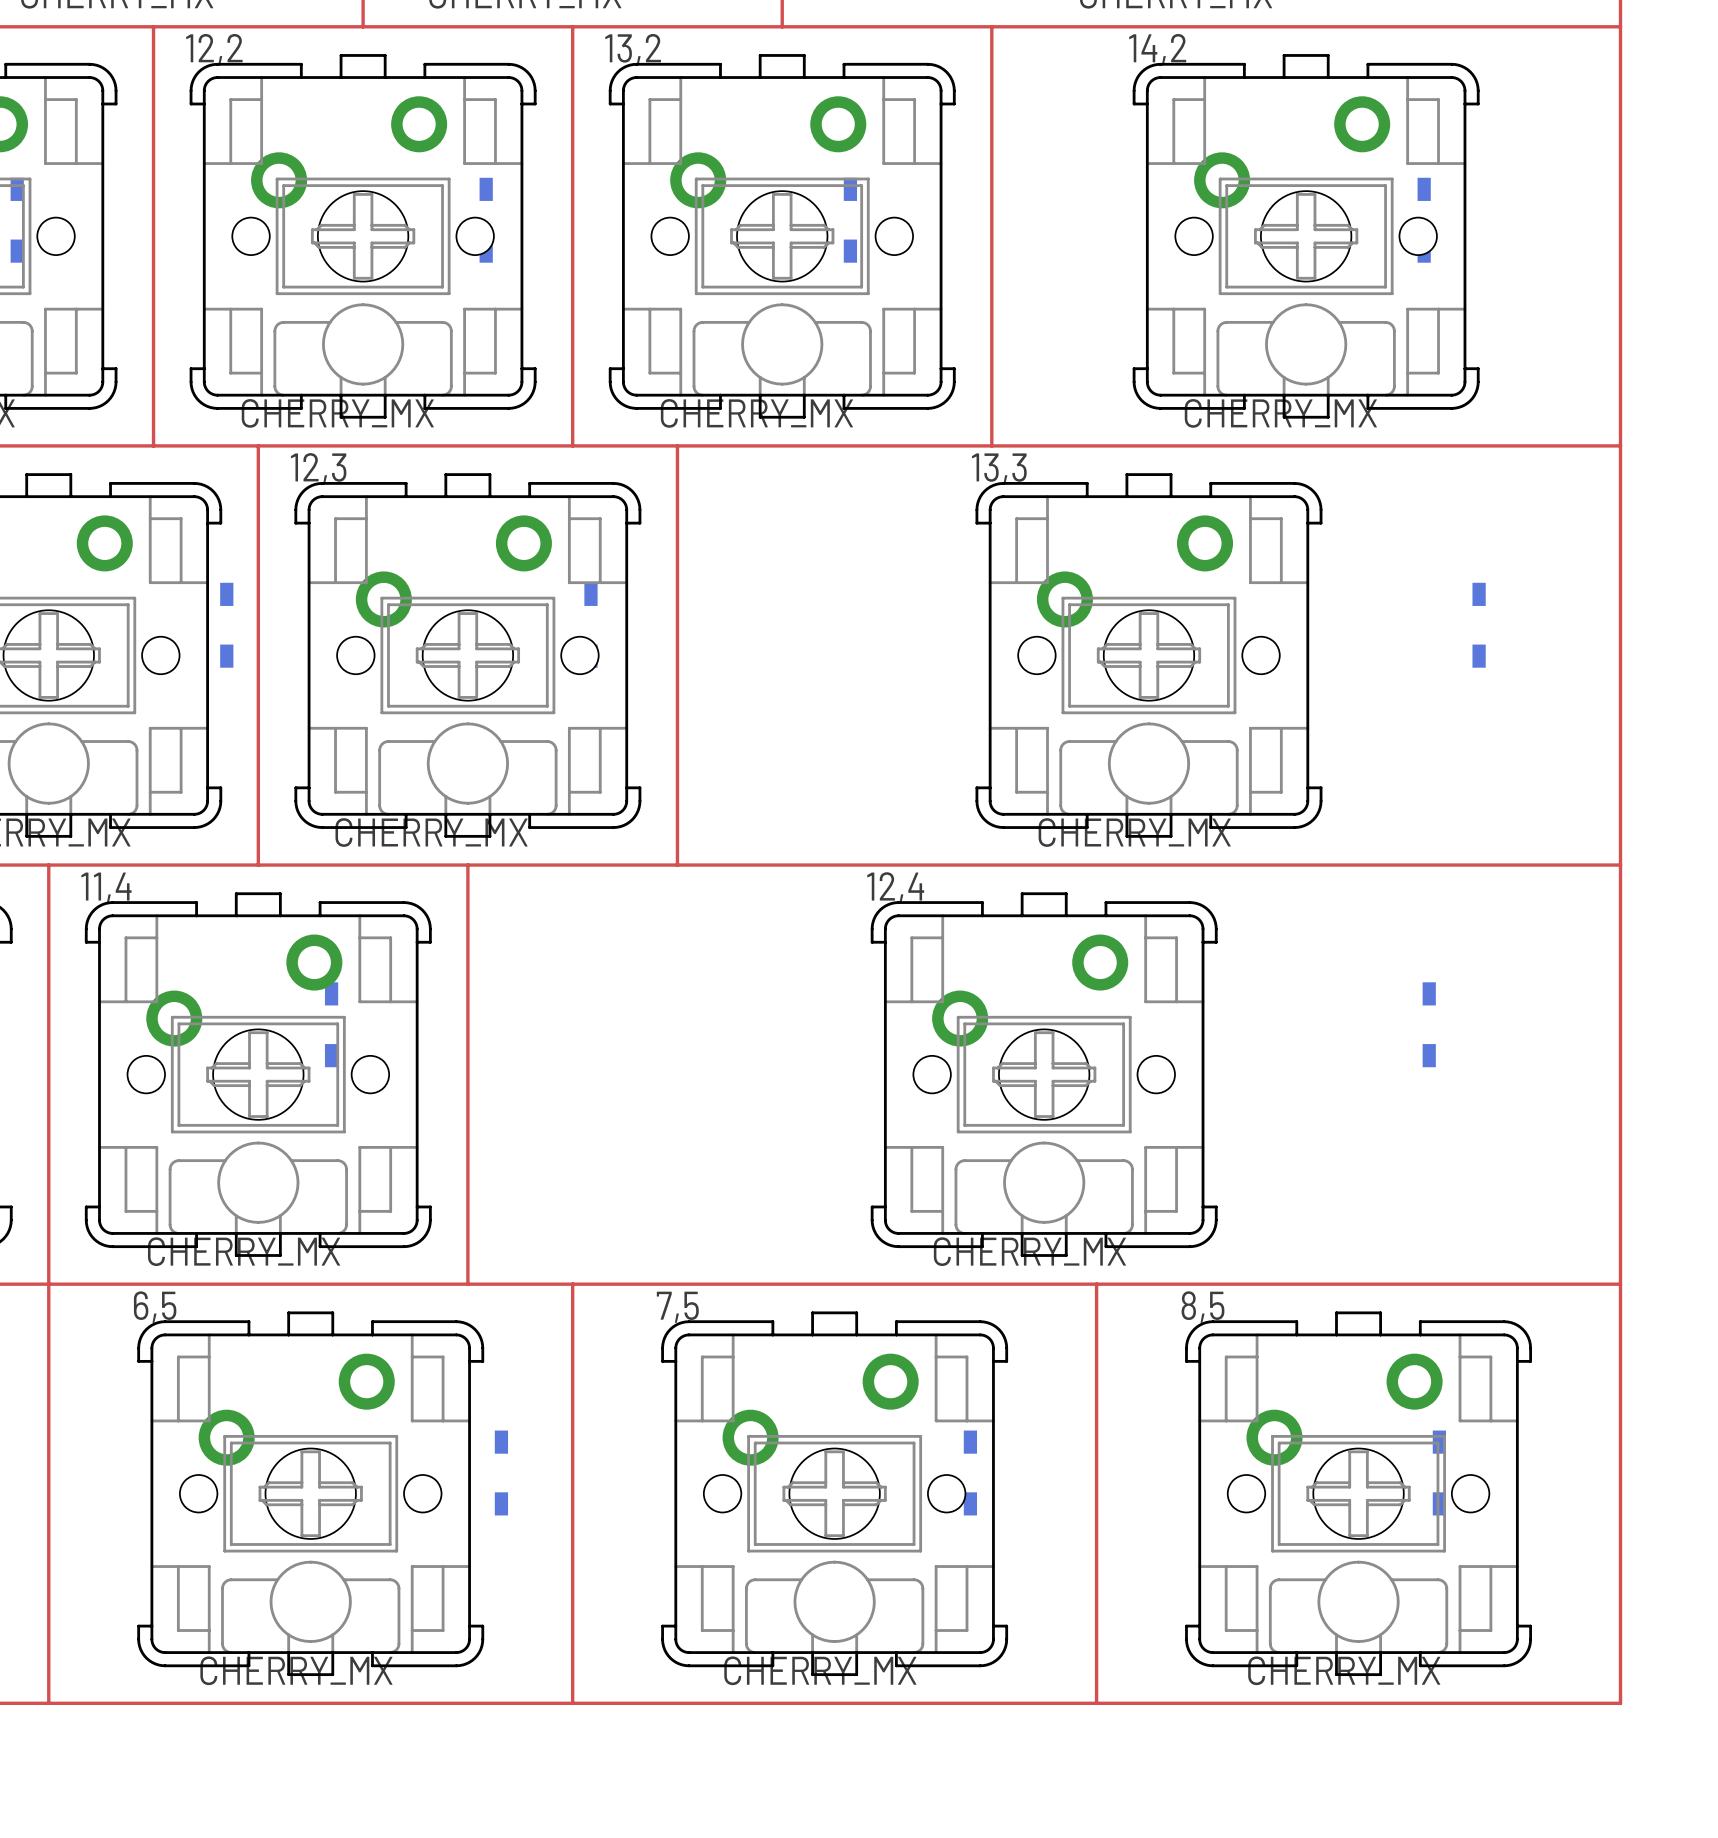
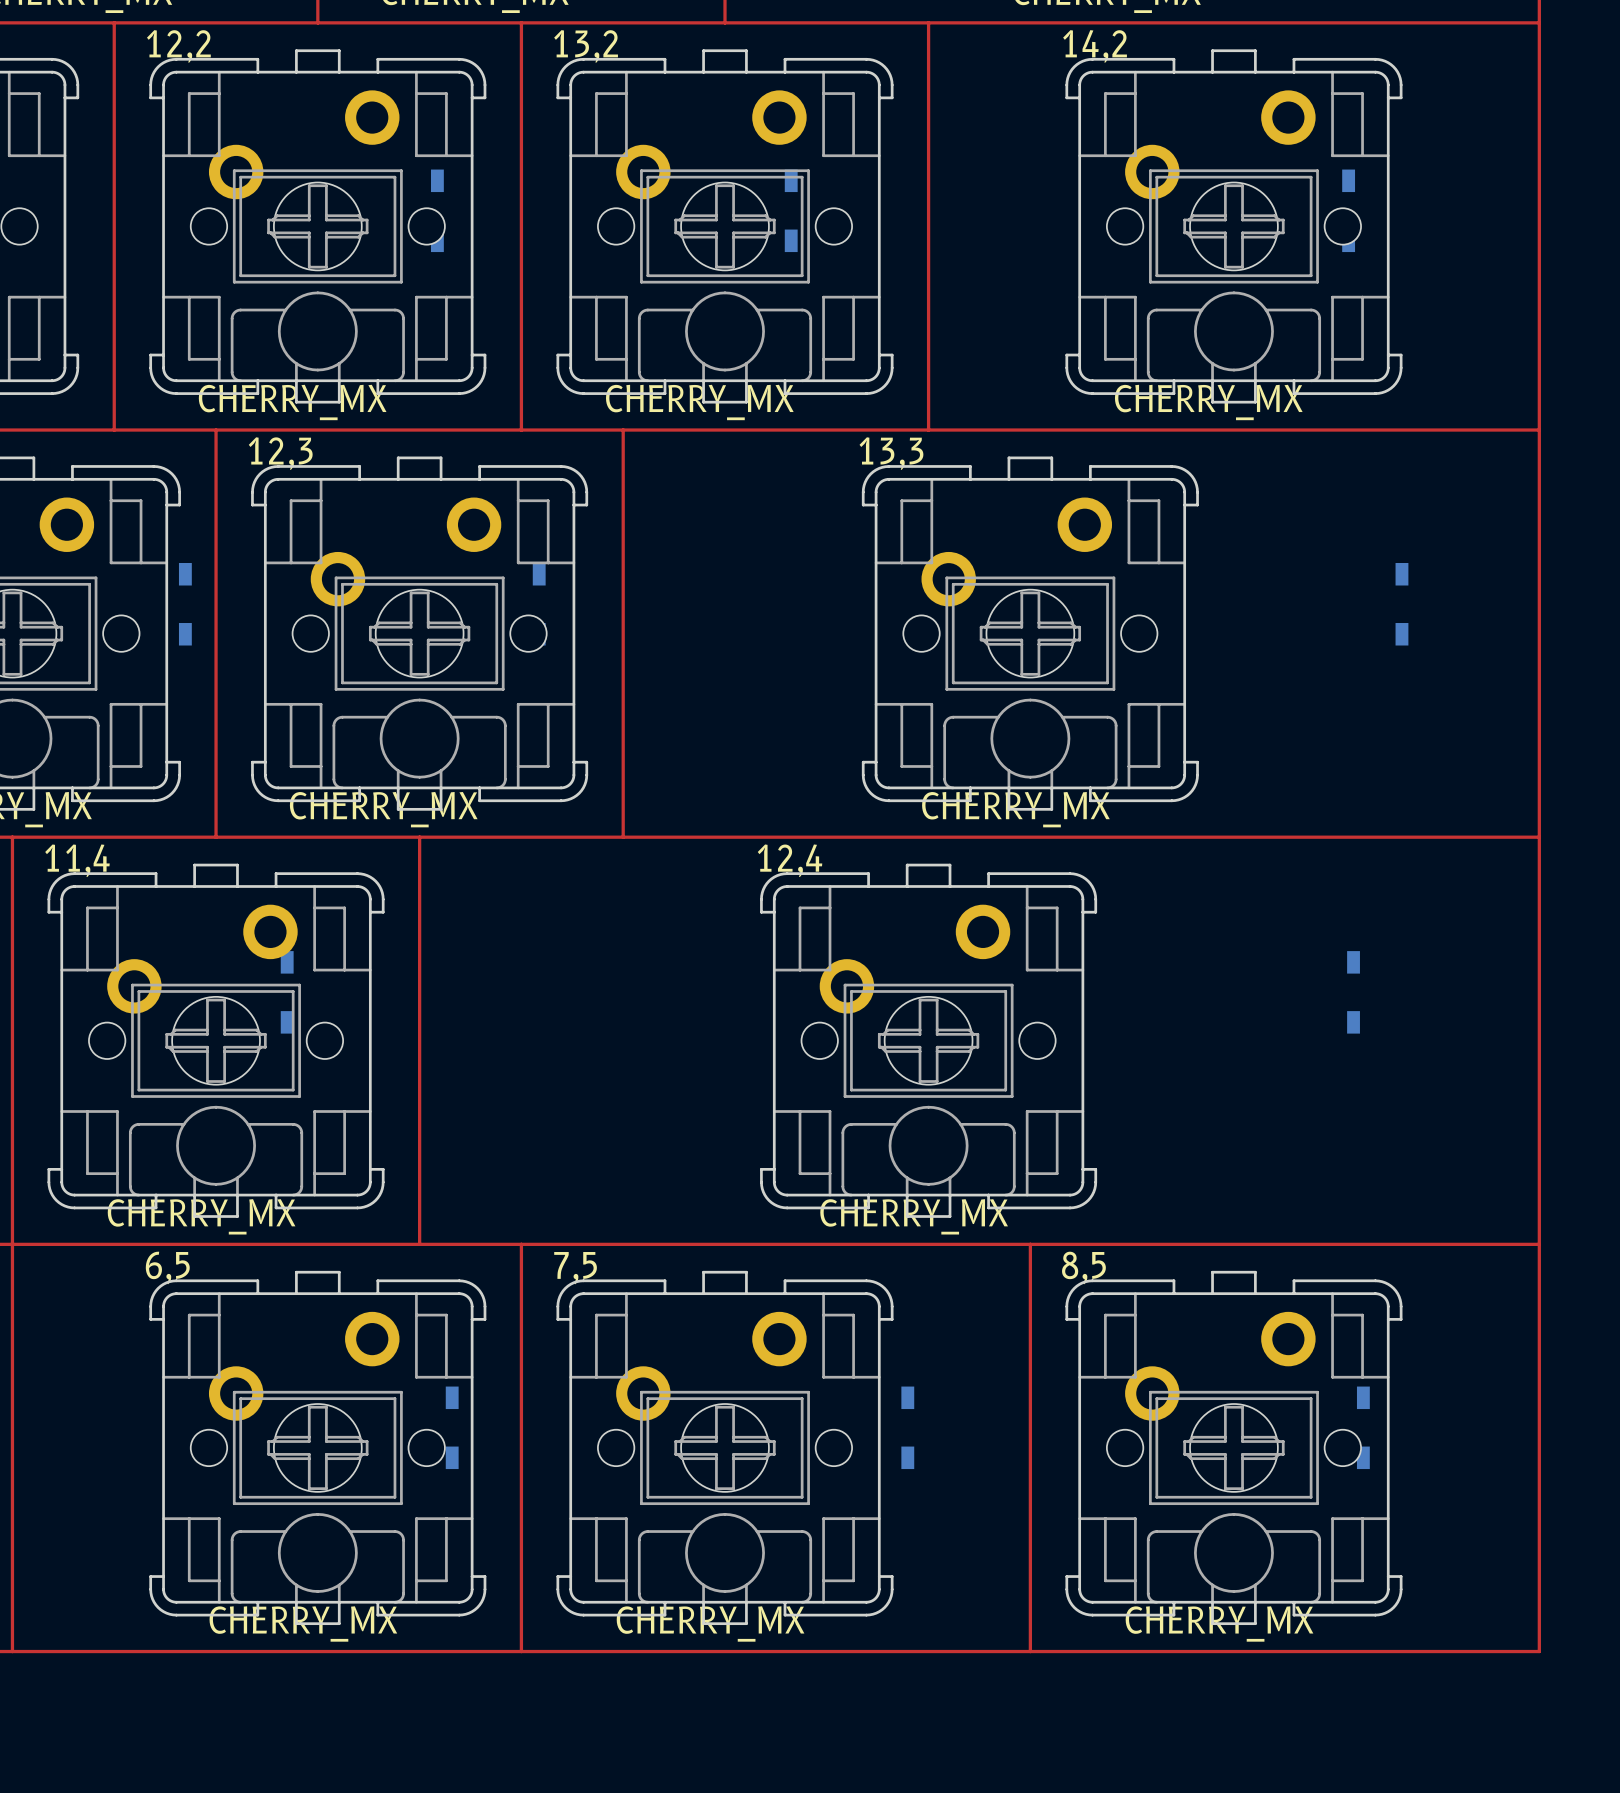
13,3 position: (1148, 655) -> (1030, 633)
12,4 position: (1044, 1074) -> (928, 1040)
6,5 position: (310, 1493) -> (317, 1447)
7,5 position: (834, 1493) -> (725, 1447)
8,5 position: (1358, 1493) -> (1233, 1447)

